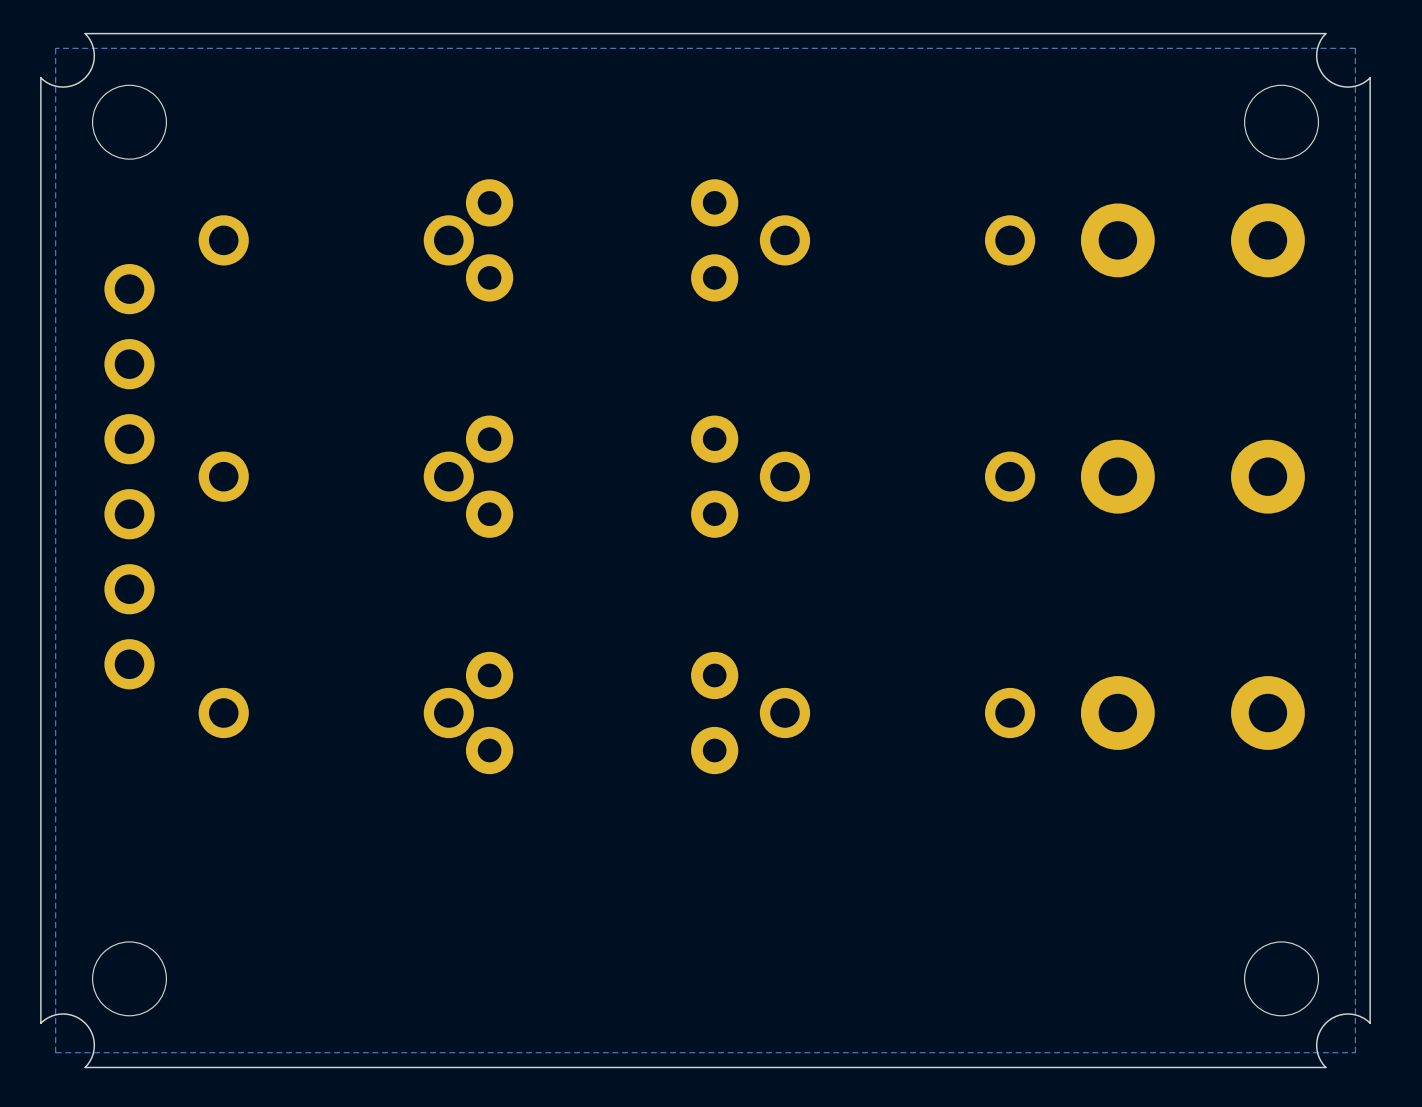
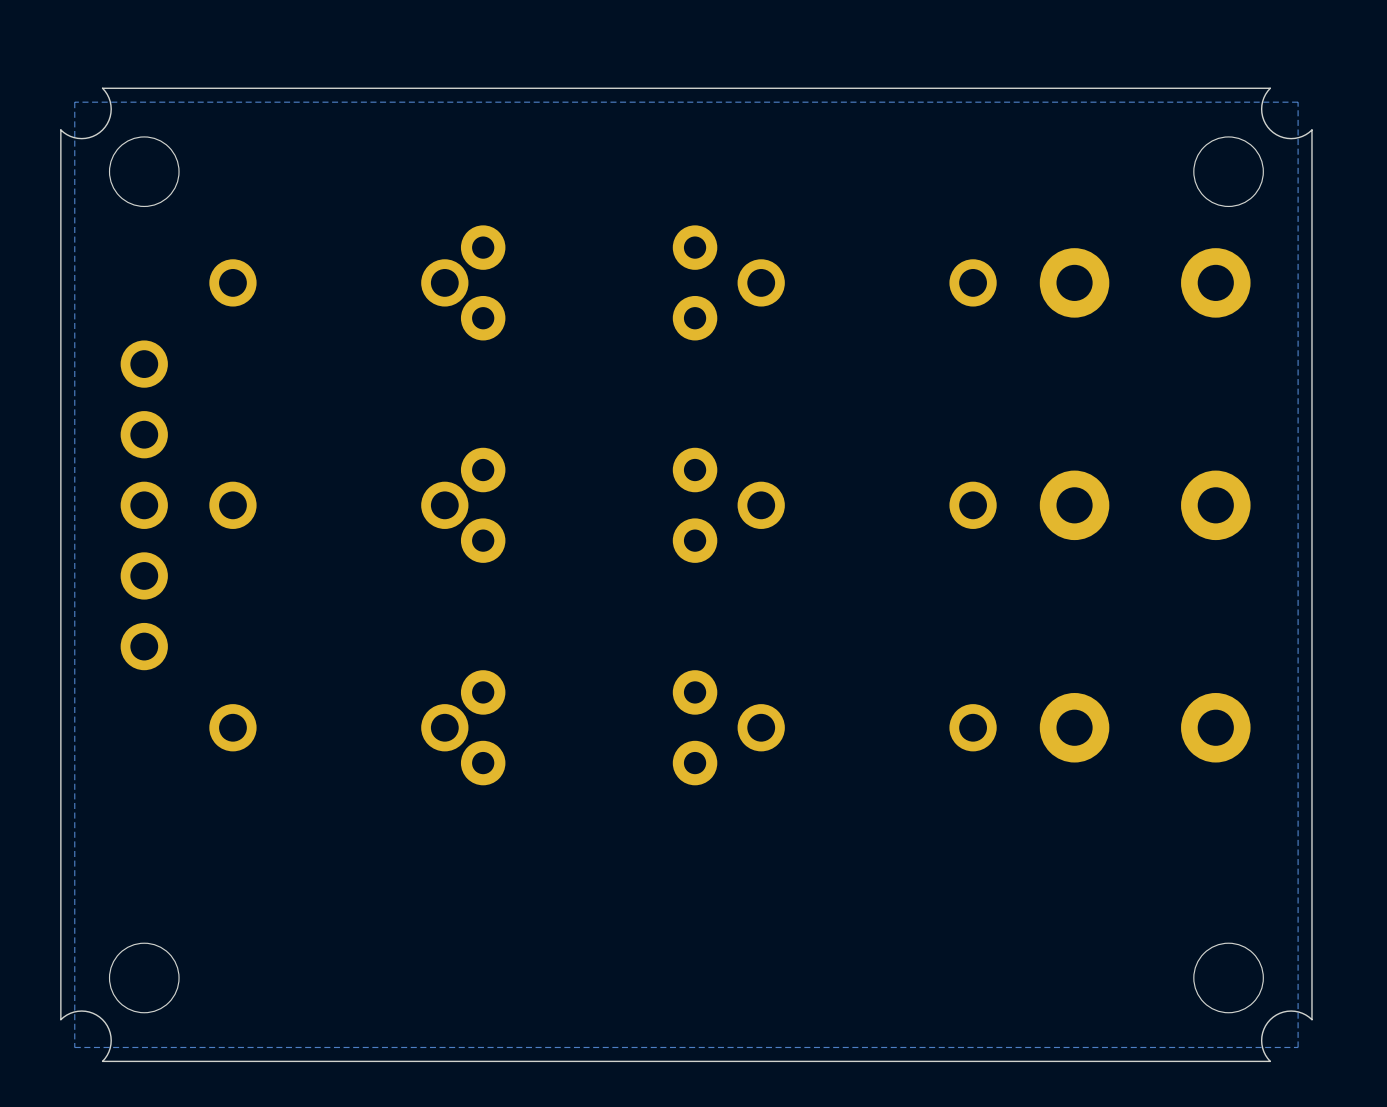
part footprint: [104, 264, 155, 690] -> [120, 340, 168, 671]

